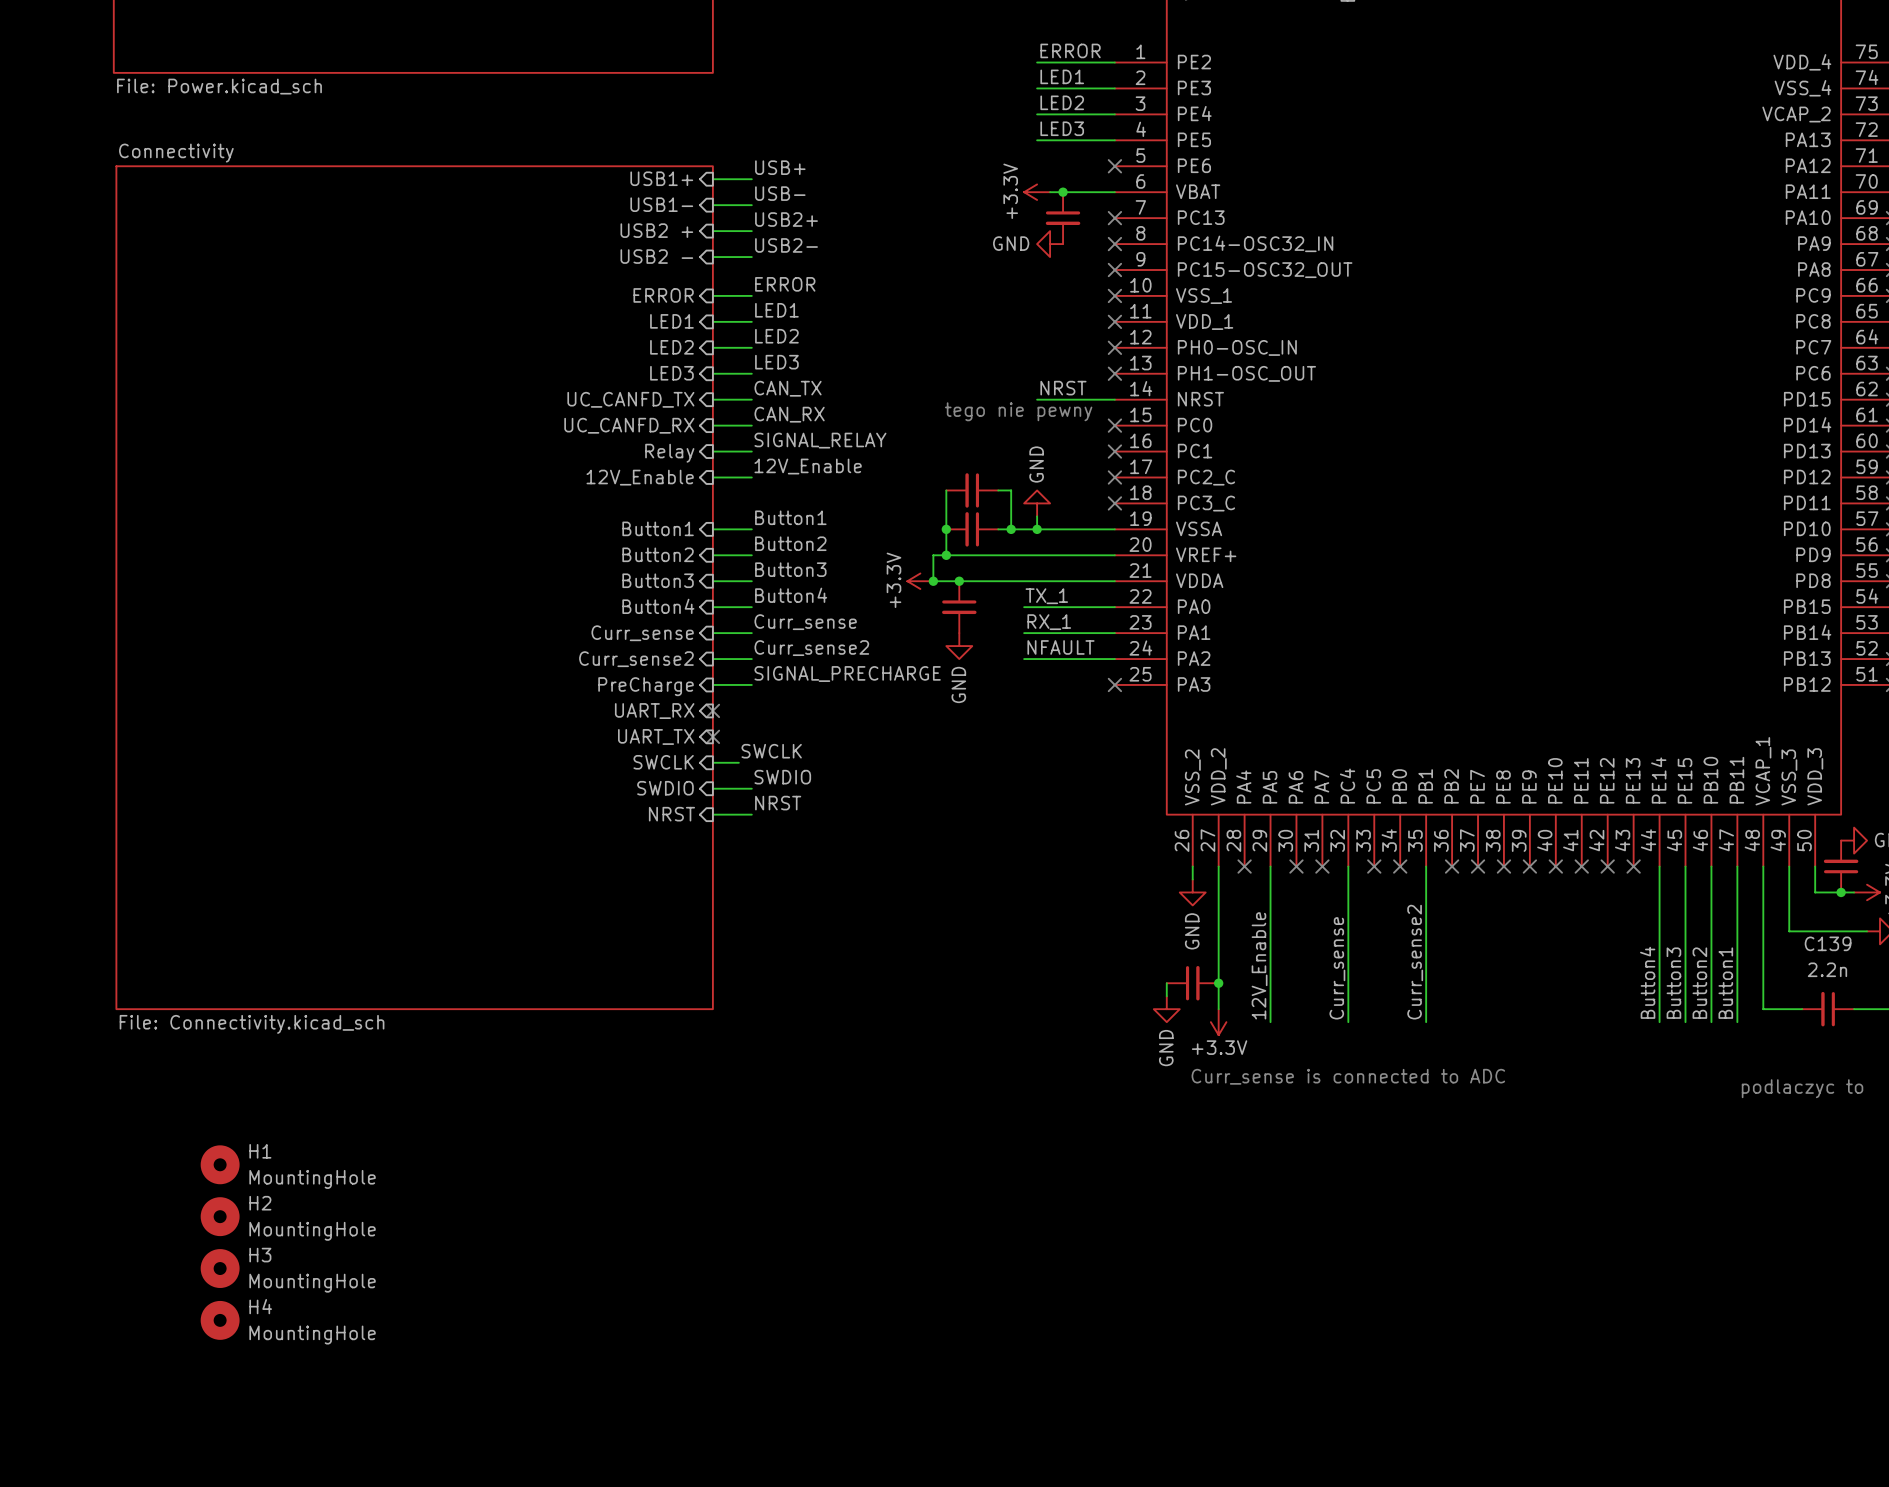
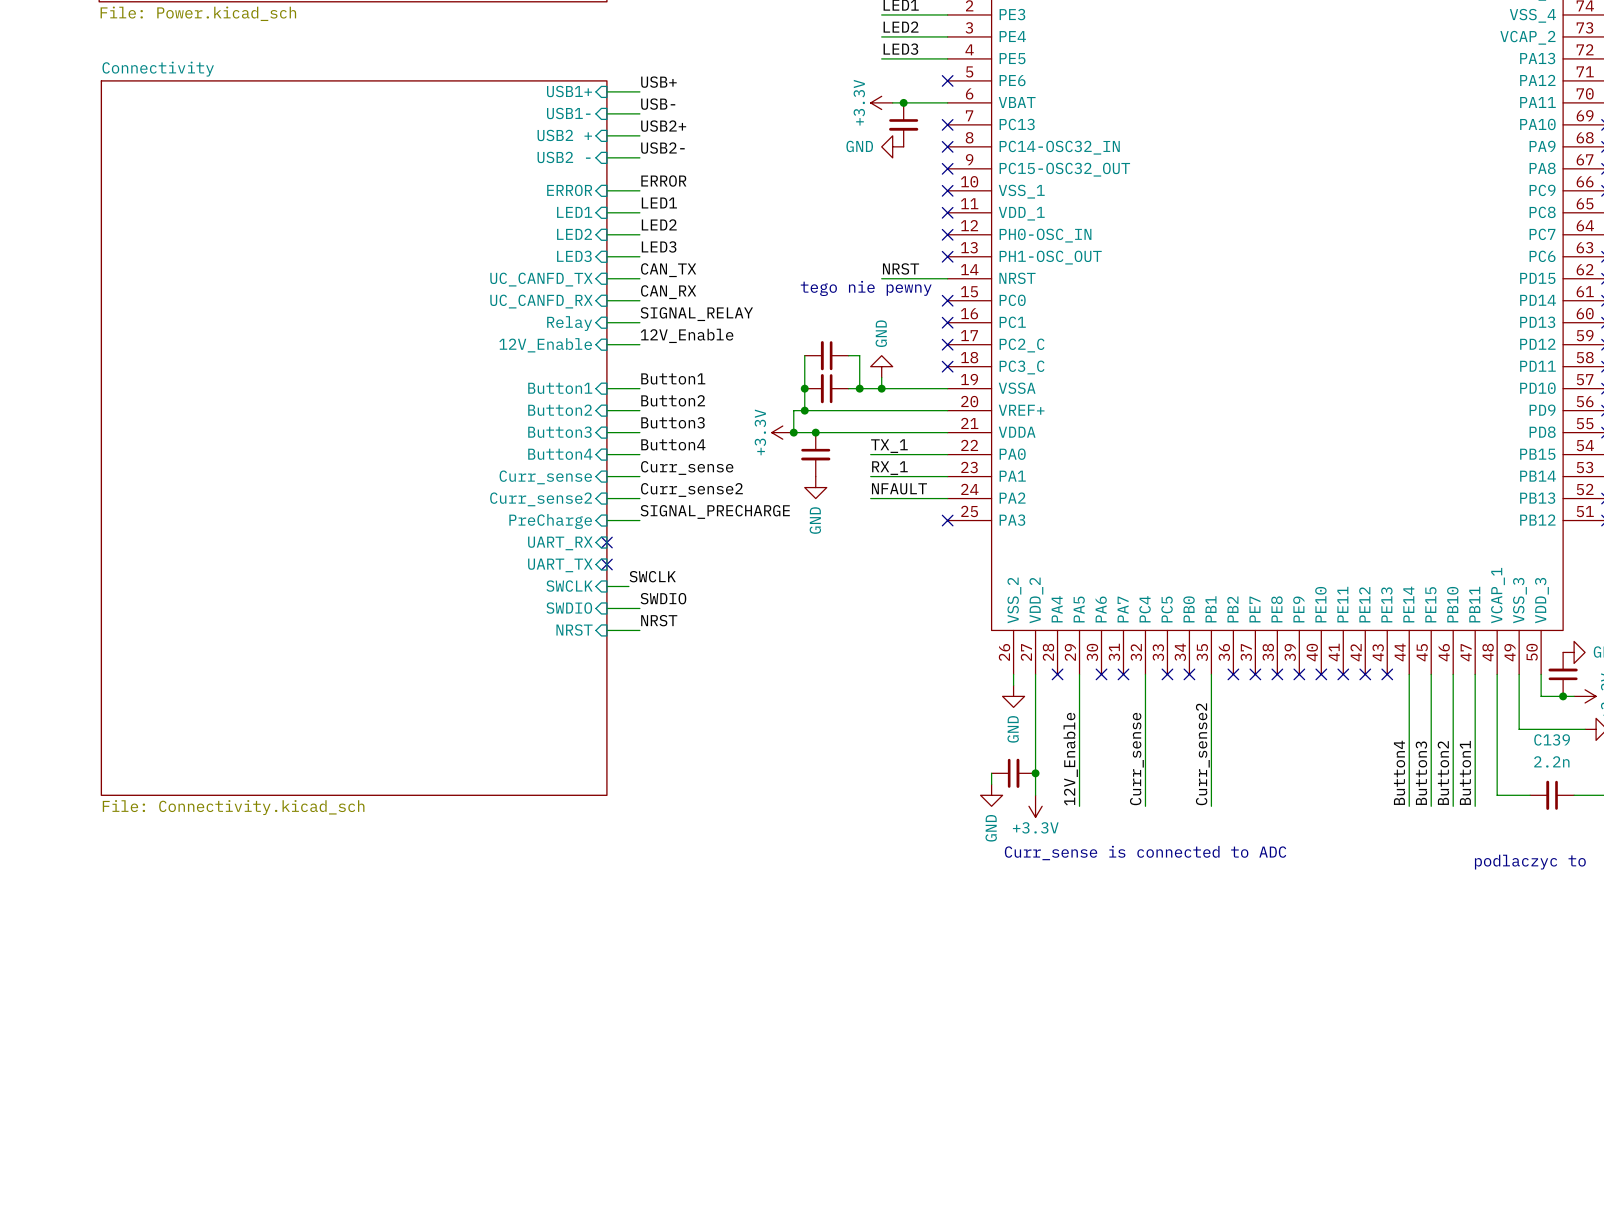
H1: MountingHole (220, 1164) -> none
H2: MountingHole (220, 1216) -> none
H3: MountingHole (220, 1268) -> none
H4: MountingHole (220, 1320) -> none

